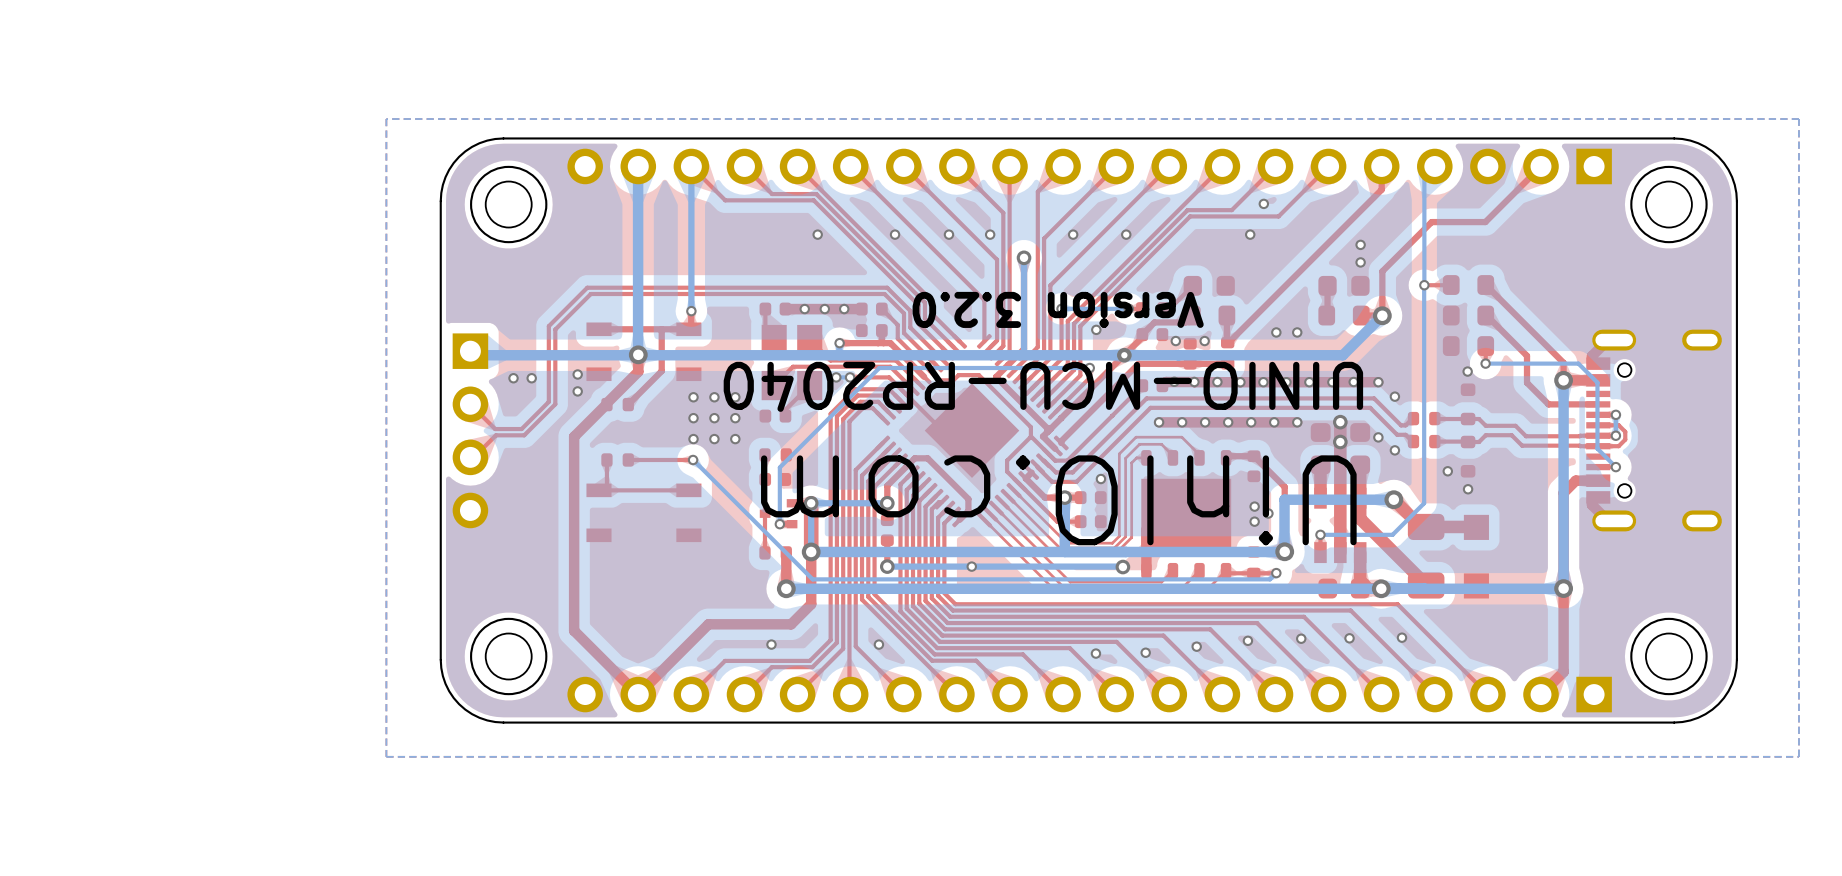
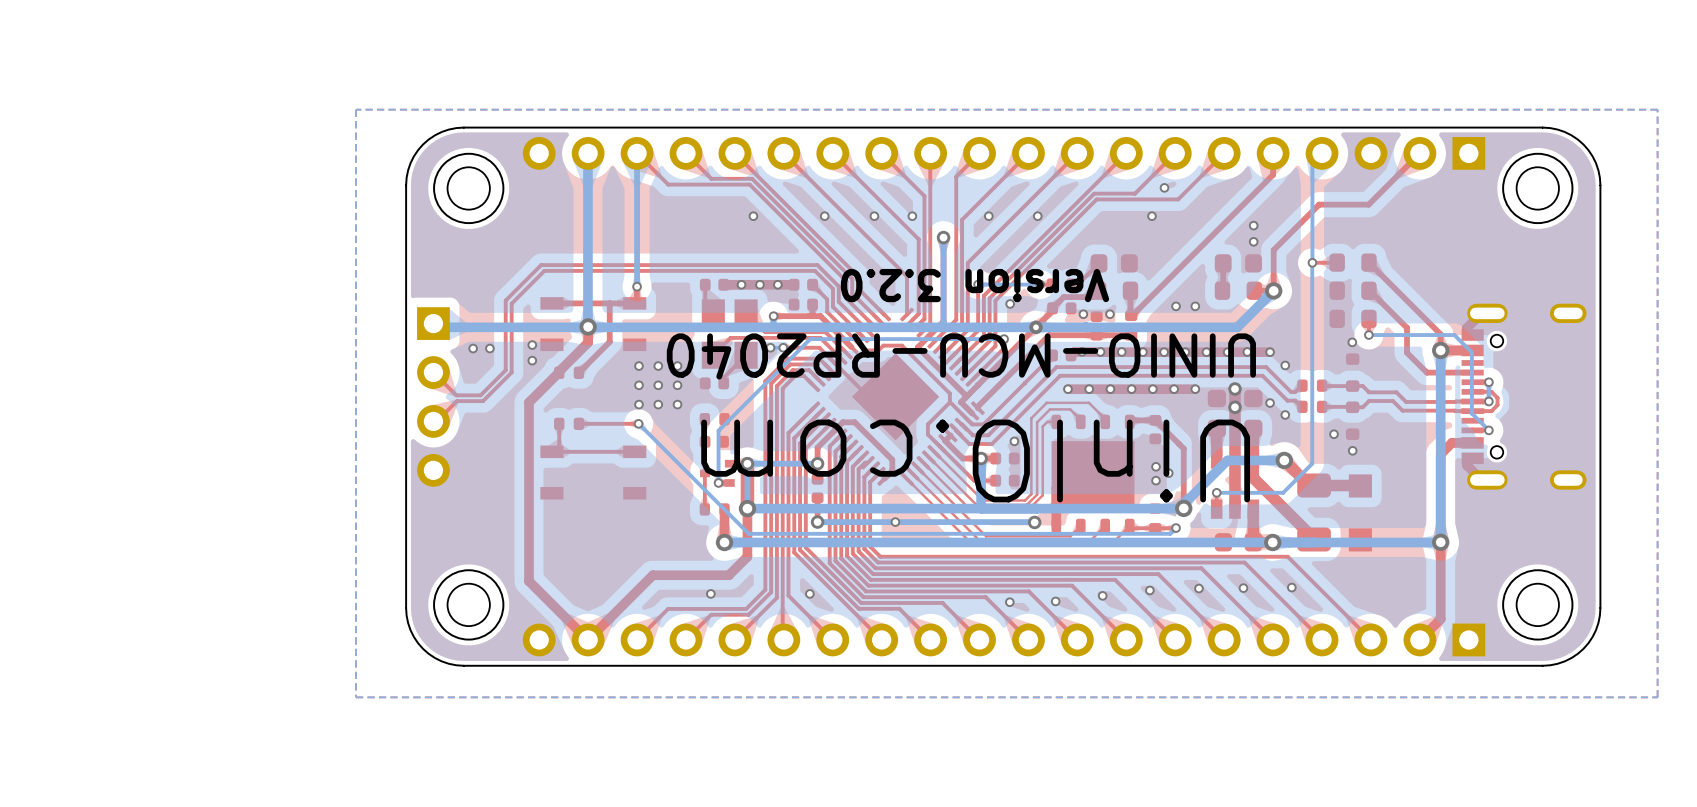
bottom track: (1332, 499) (1284, 499) (1284, 551) -> (1227, 460) (1179, 508)

